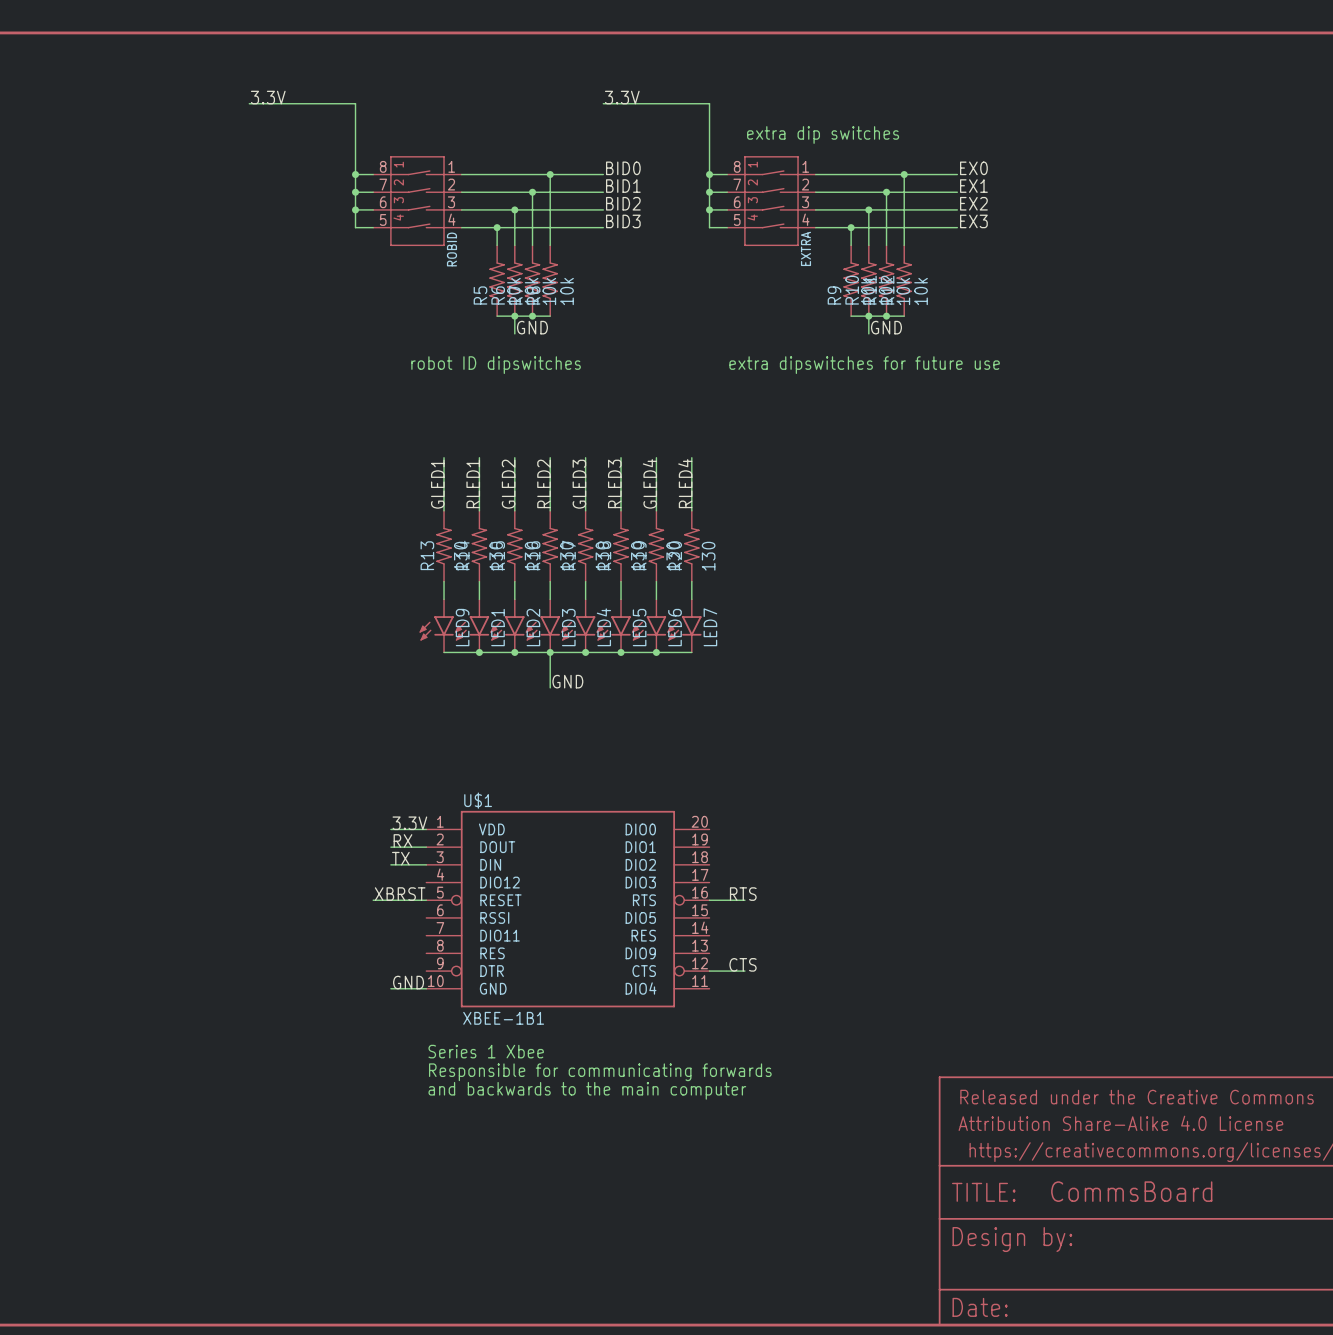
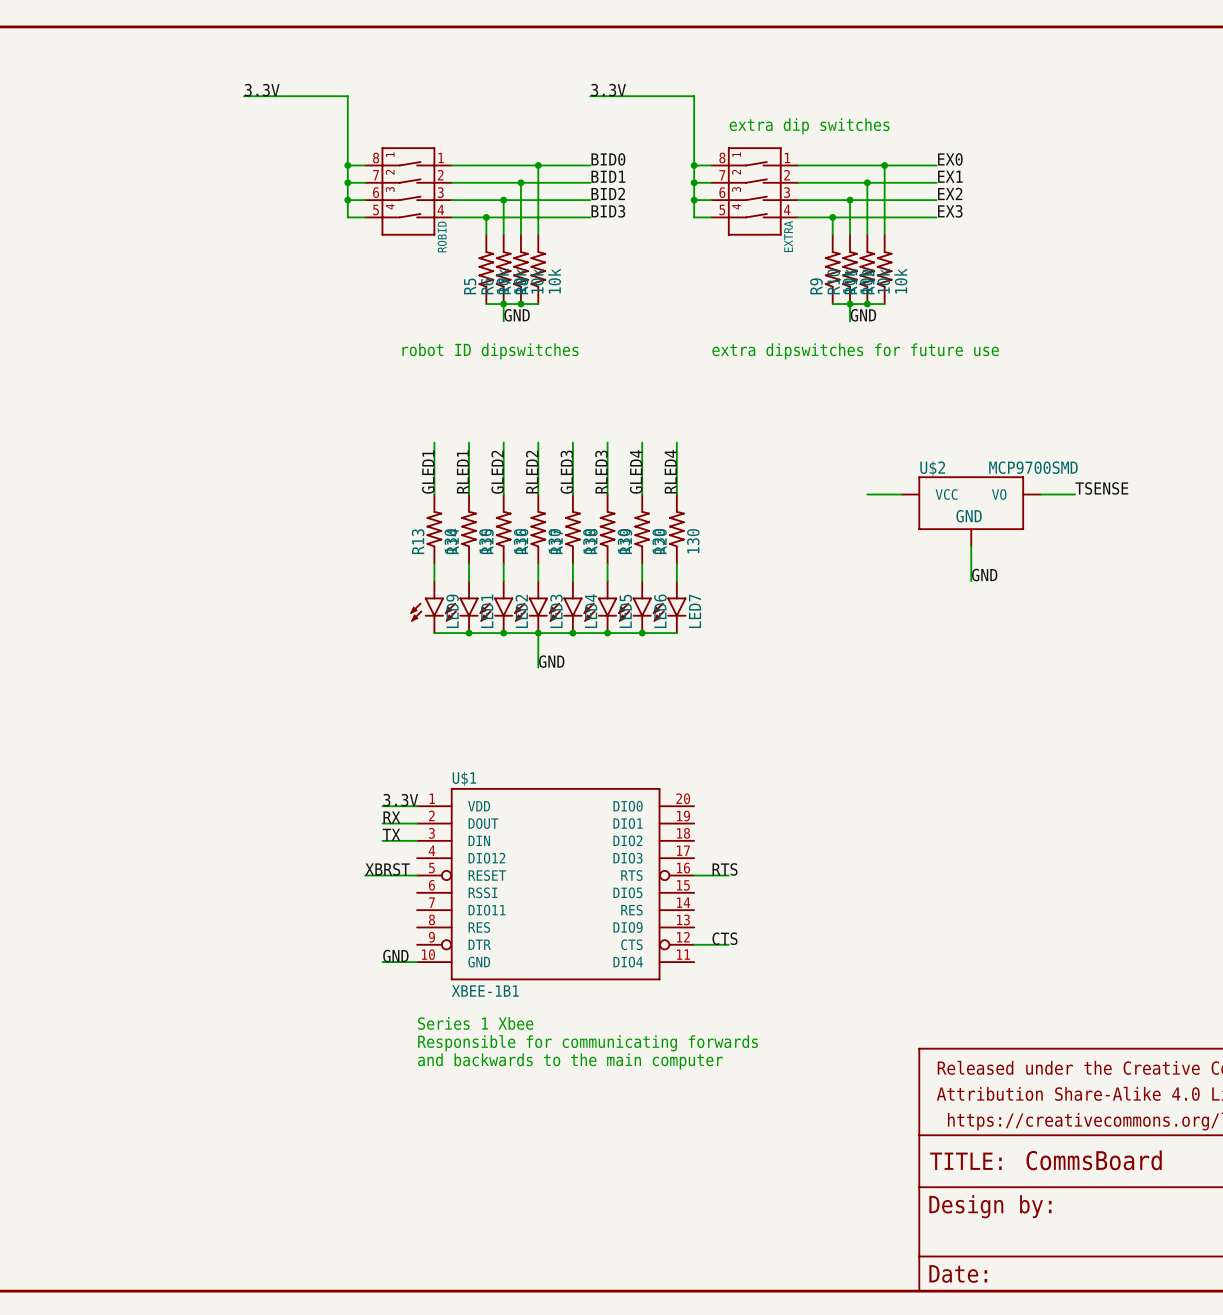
label: none -> TSENSE (1101, 488)
wire: none -> (867, 494) (901, 494)
wire: none -> (1040, 494) (1075, 494)
U$2: none -> MCP9700SMD (971, 511)
wire: none -> (971, 546) (971, 581)
label: none -> GND (984, 575)

